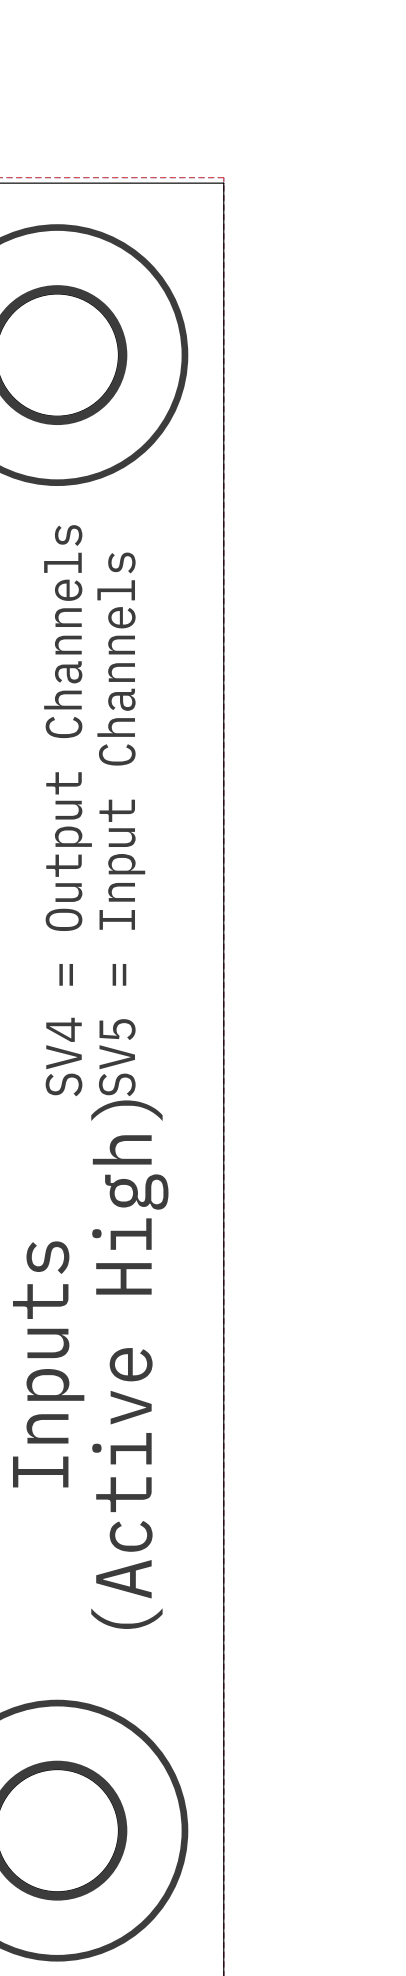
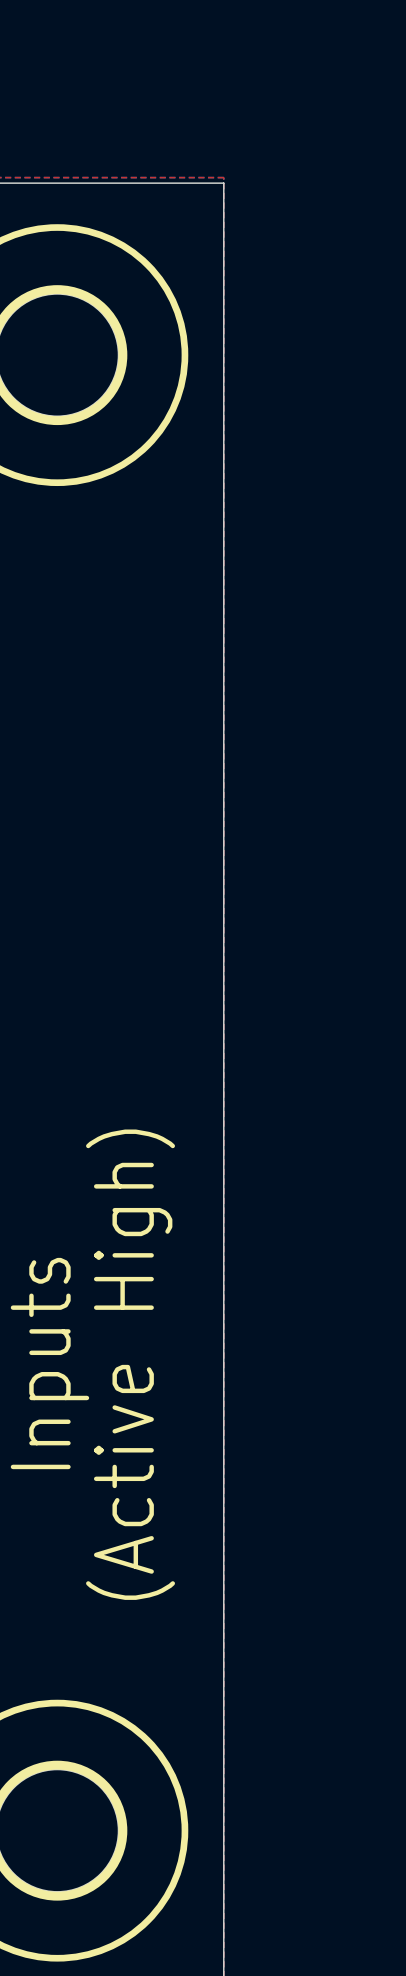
text: SV4 = Output Channels (68, 810) -> none
text: SV5 = Input Channels (121, 824) -> none

